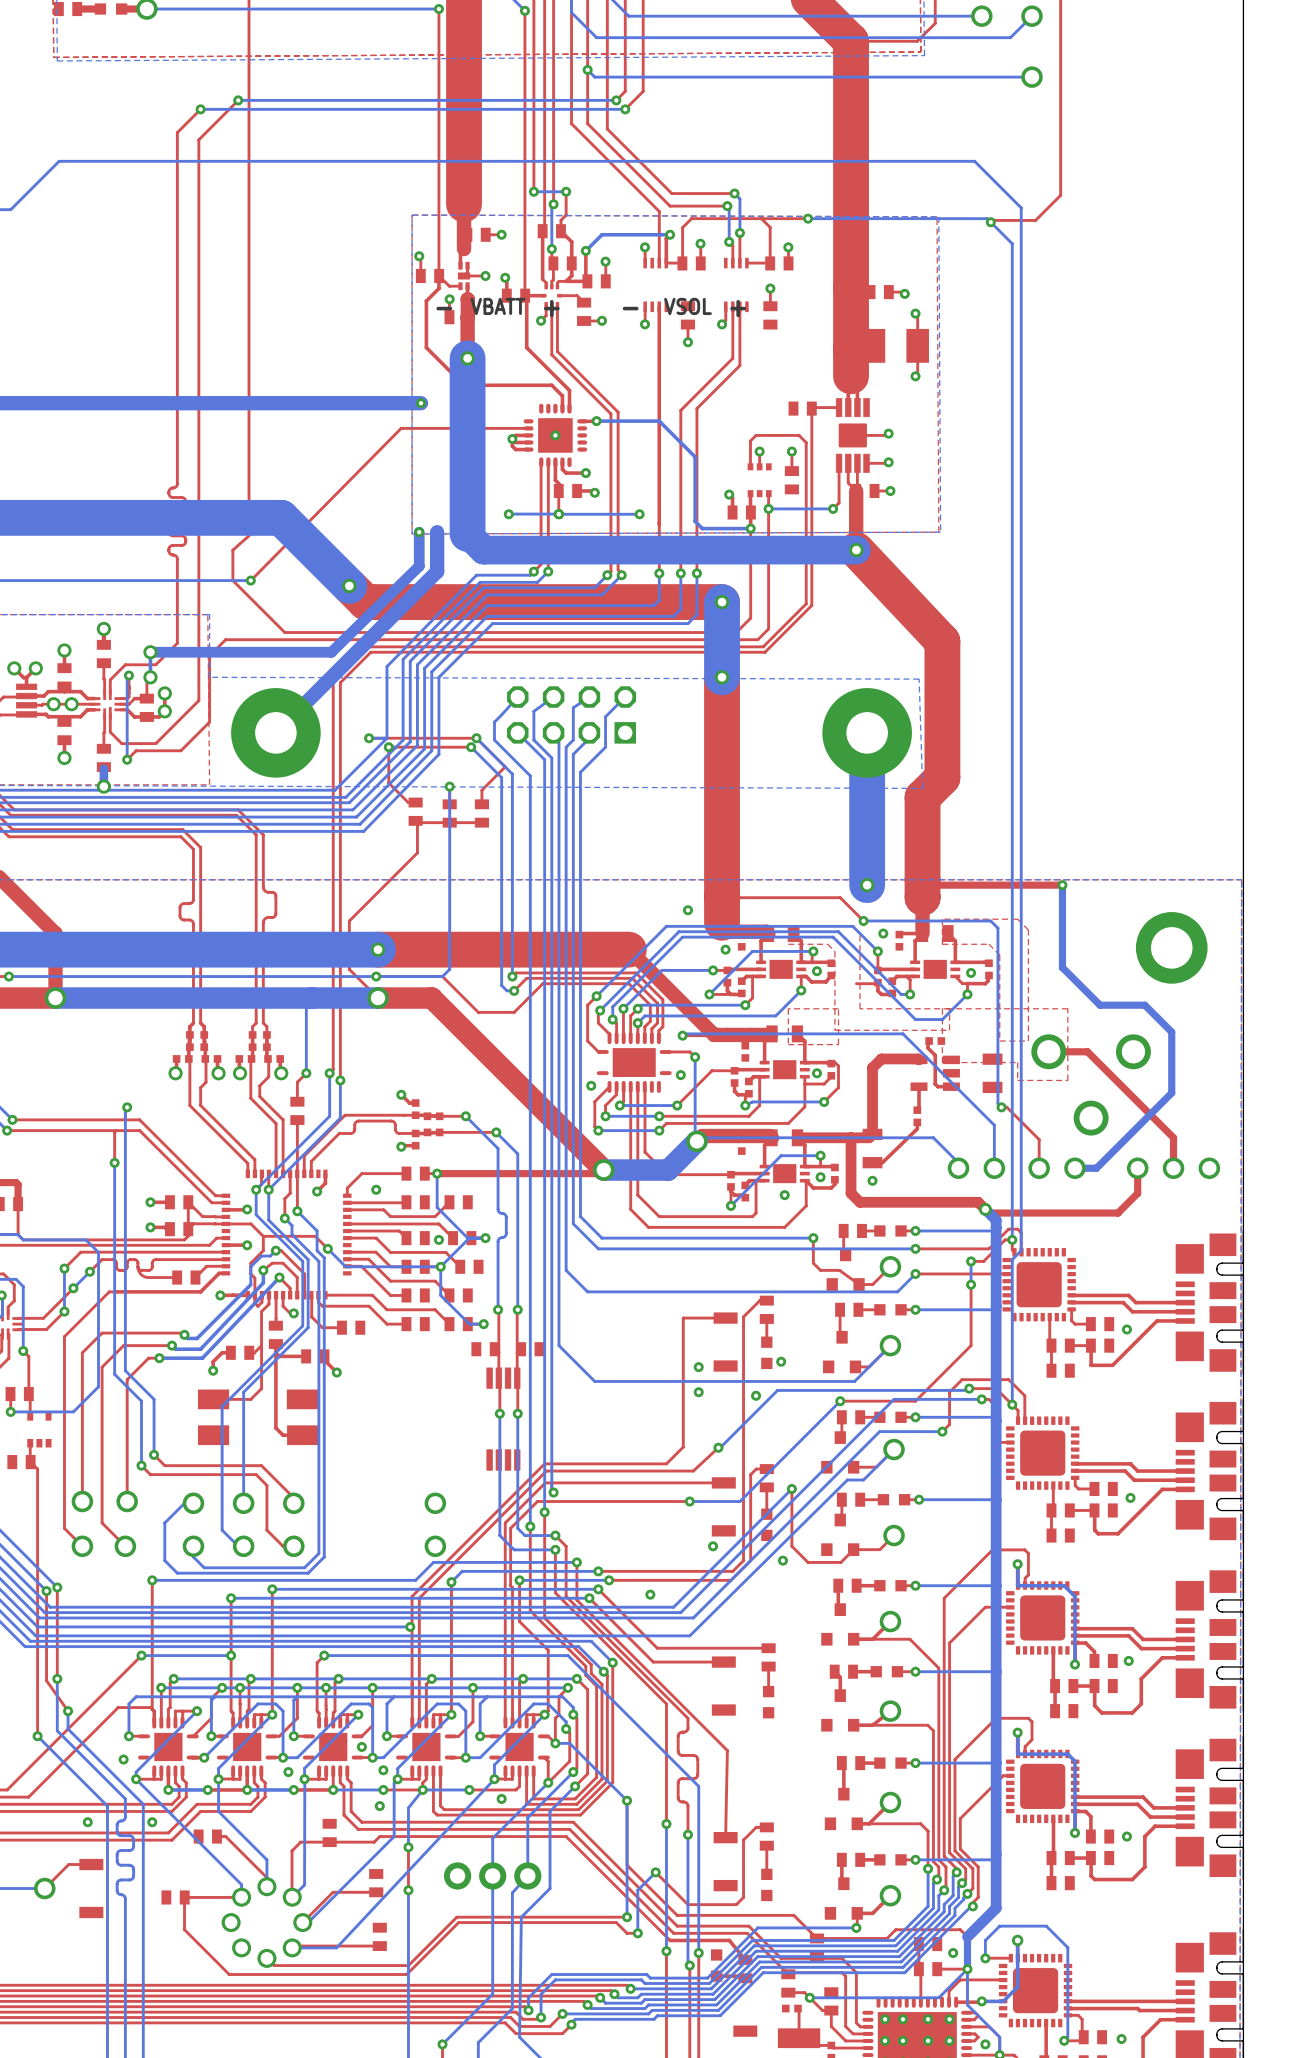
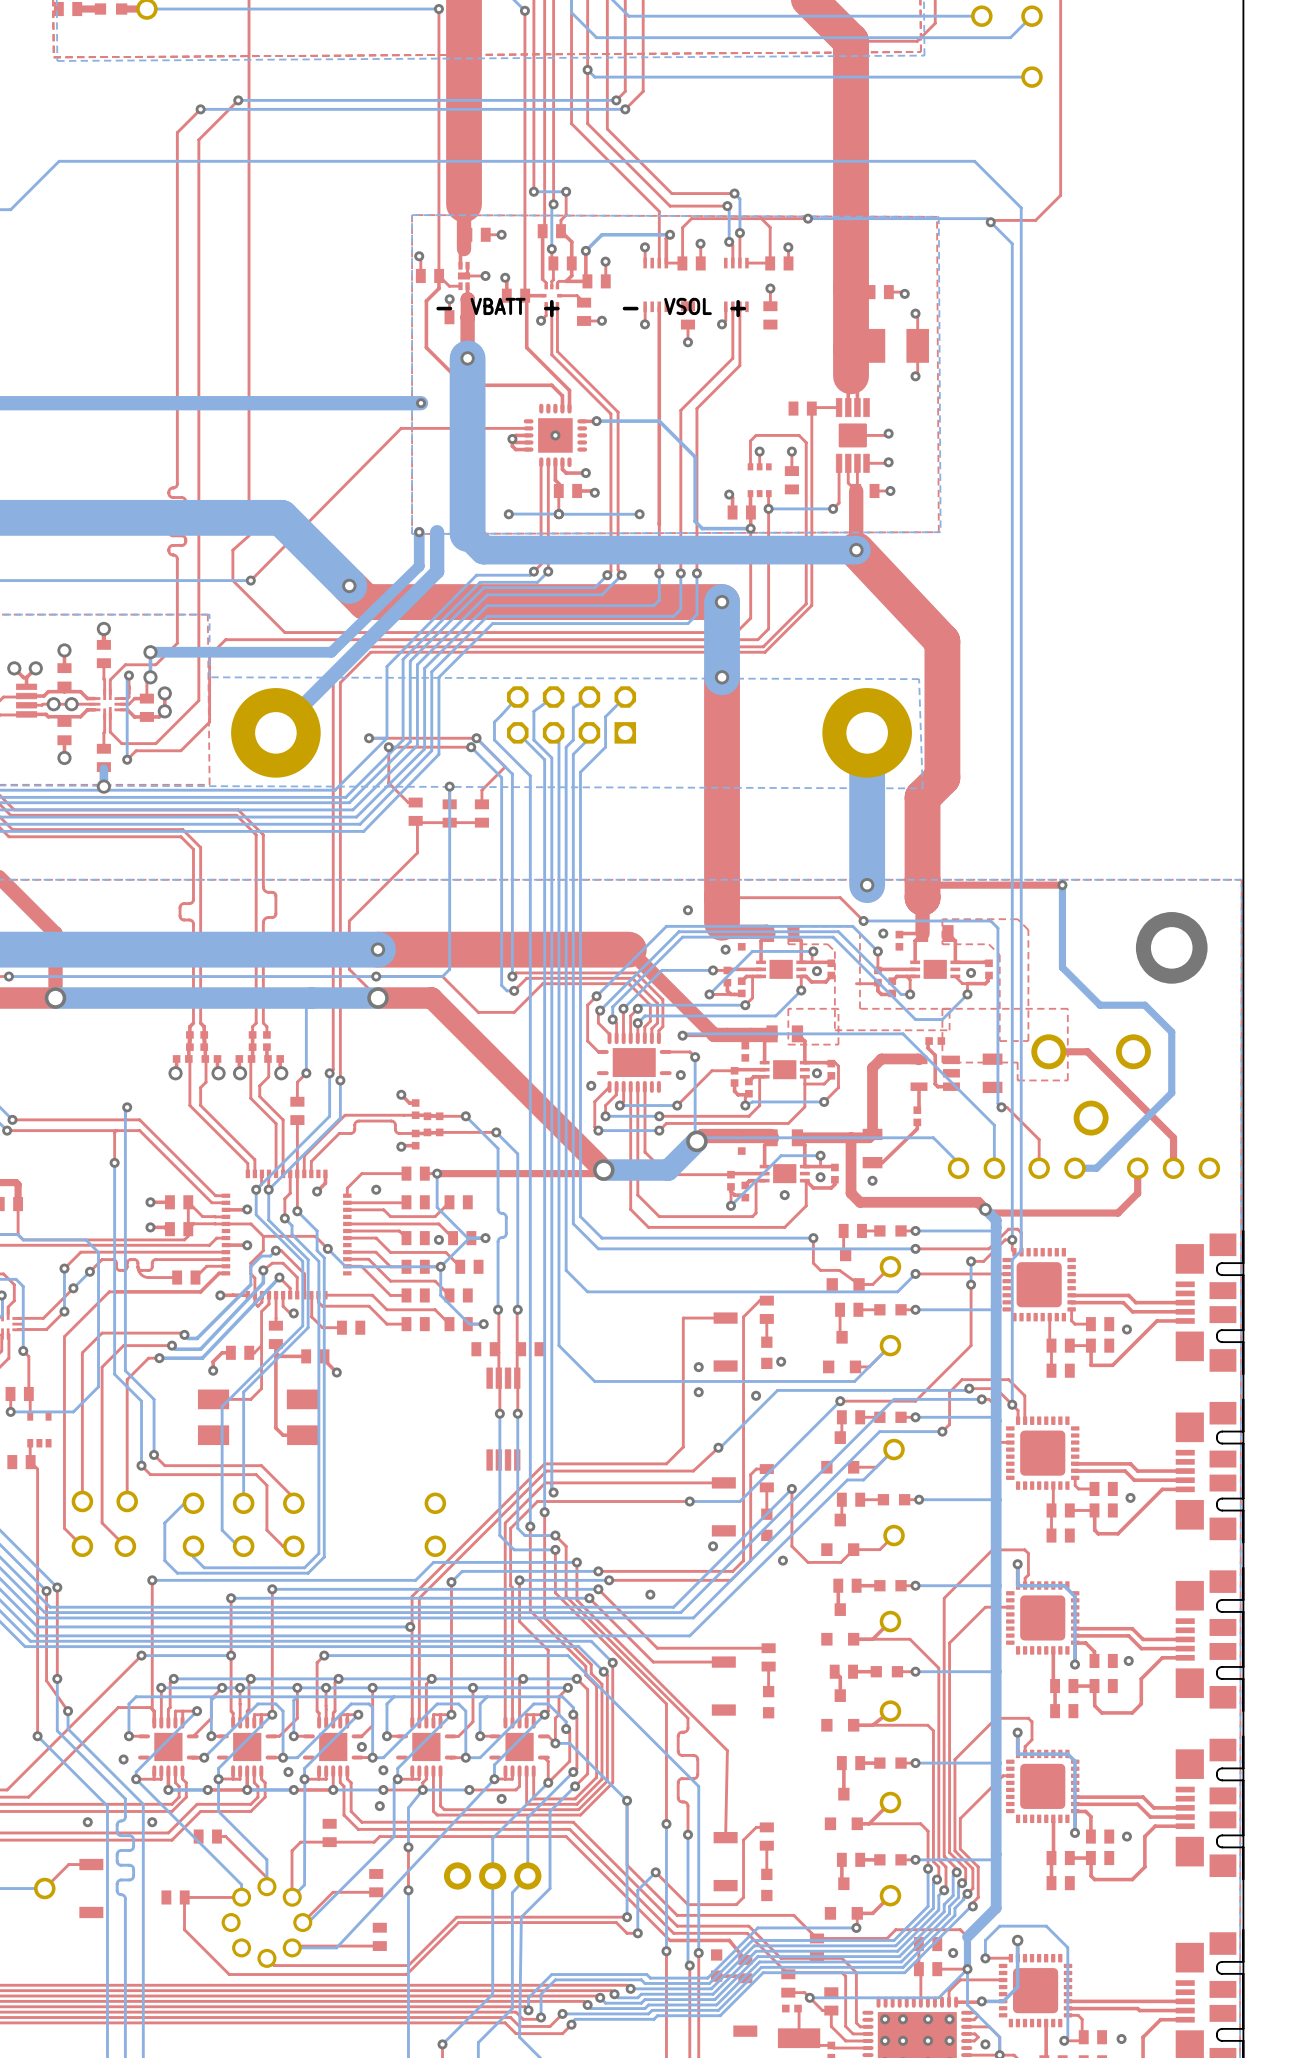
top track: (266, 1034) (266, 1047) (266, 1034) -> none

